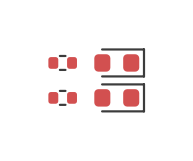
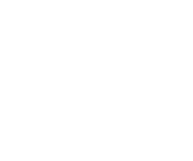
part: (62, 62) -> none
part: (119, 62) -> none
part: (62, 97) -> none
part: (119, 97) -> none

